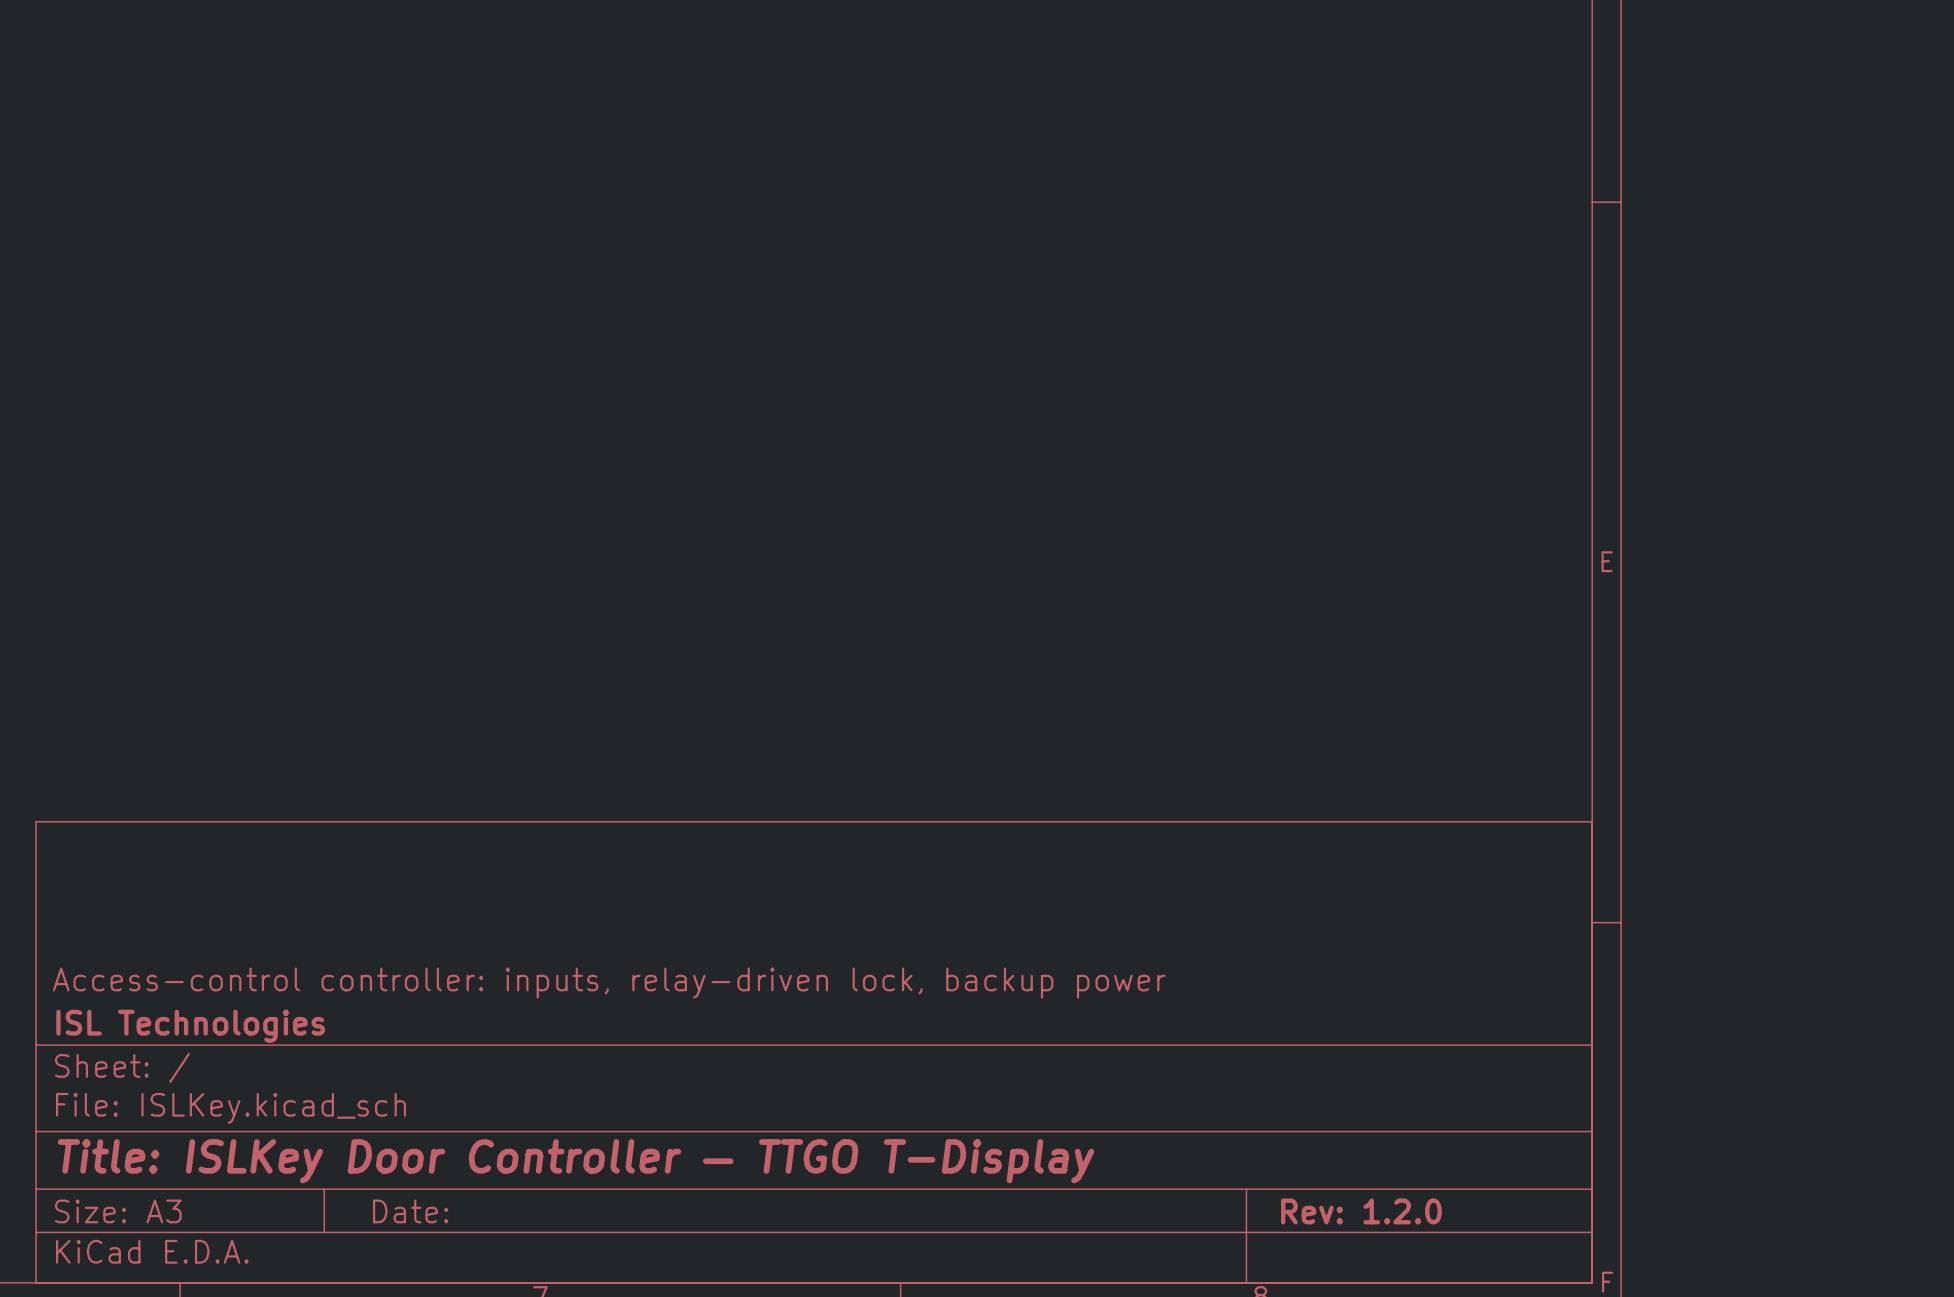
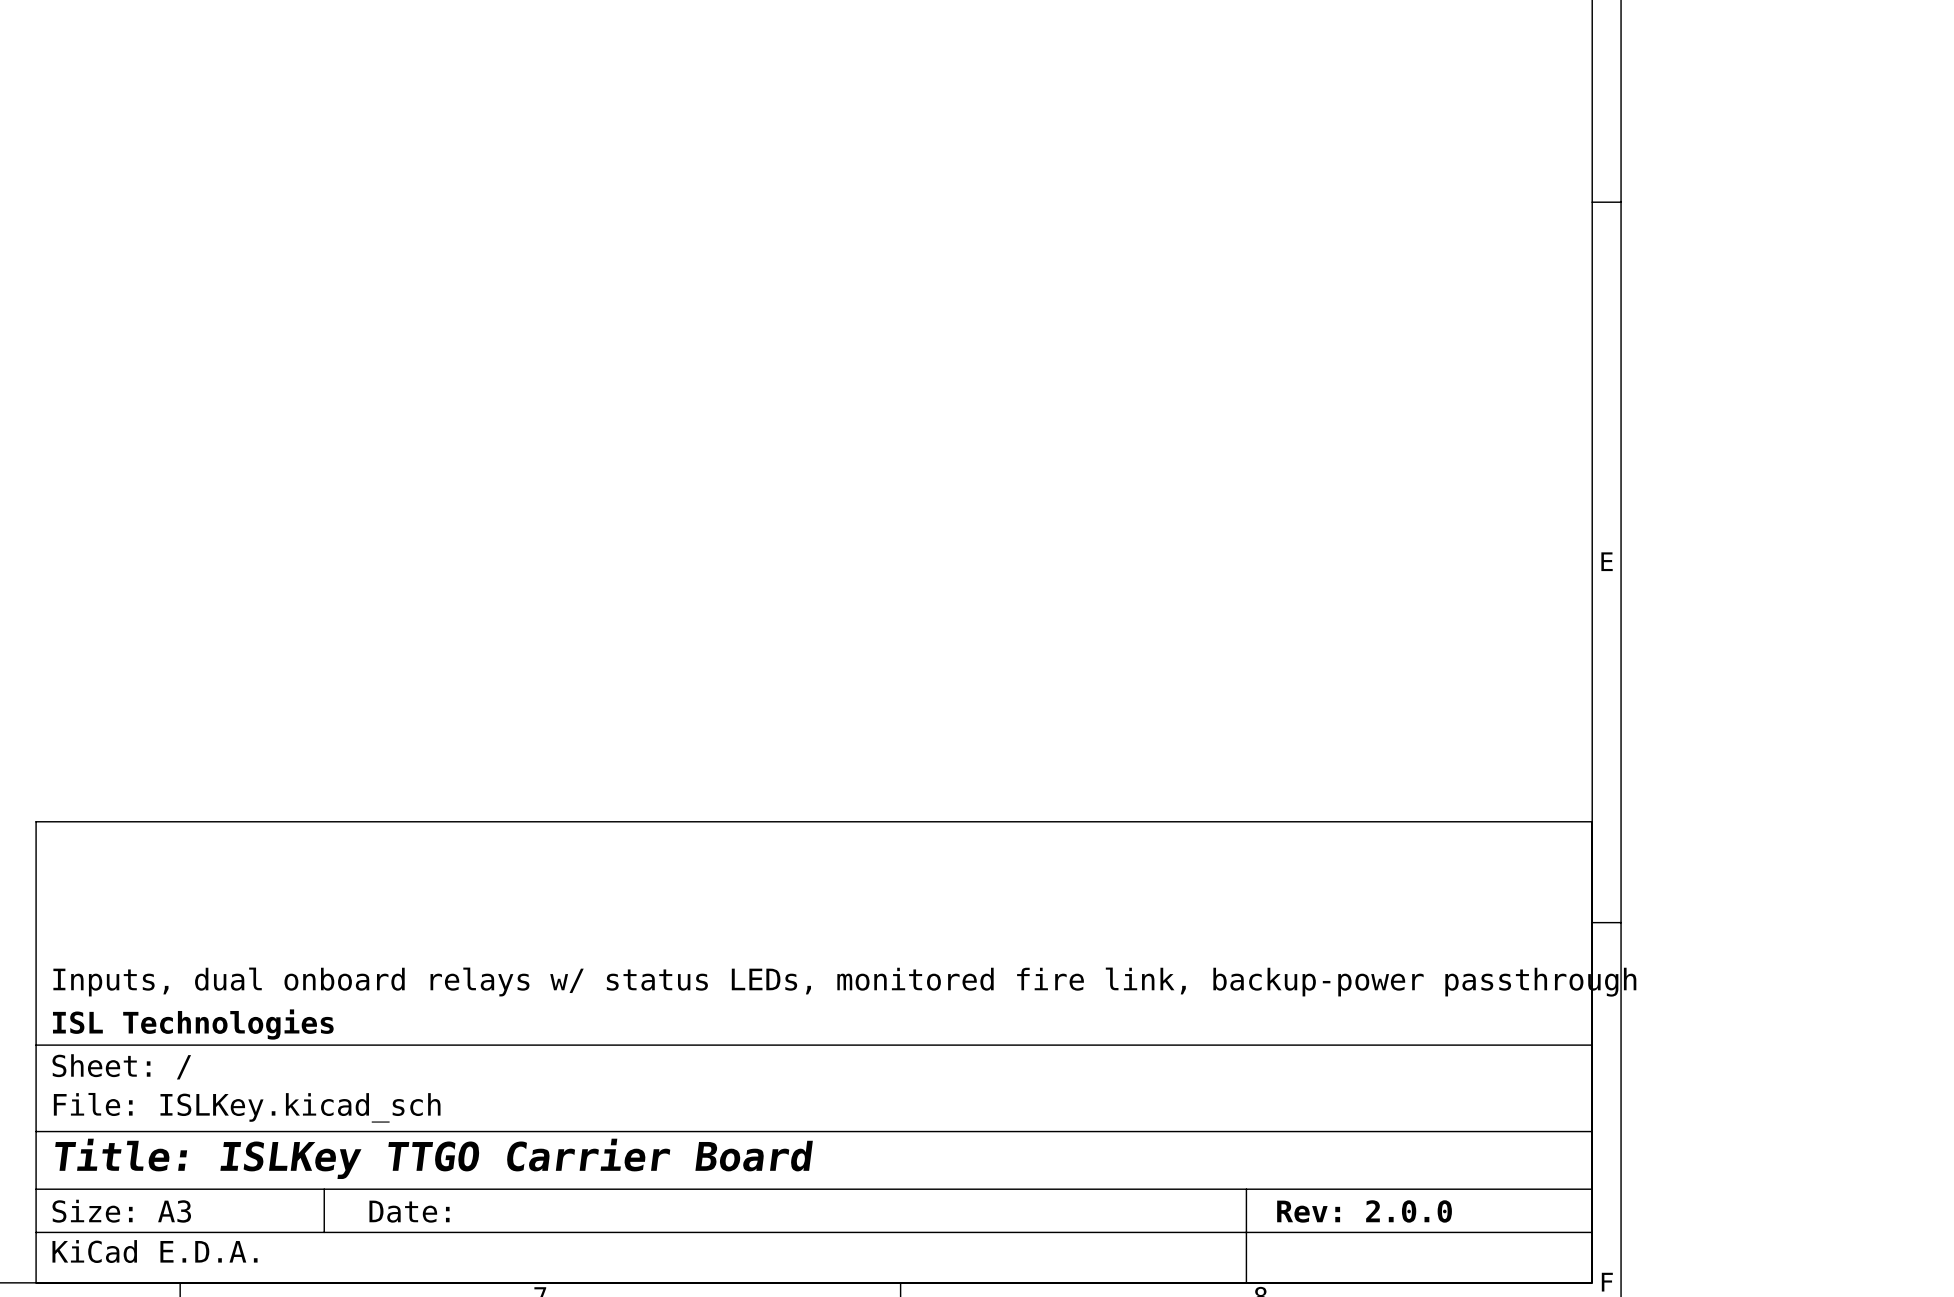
title block: Access-control controller: inputs, relay-driven lock, backup power (609, 983) -> Inputs, dual onboard relays w/ status LEDs, monitored fire link, backup-power passthrough (844, 982)
title block: Title: ISLKey Door Controller — TTGO T-Display (575, 1161) -> Title: ISLKey TTGO Carrier Board (434, 1158)
title block: Rev: 1.2.0 (1361, 1211) -> Rev: 2.0.0 (1364, 1211)

